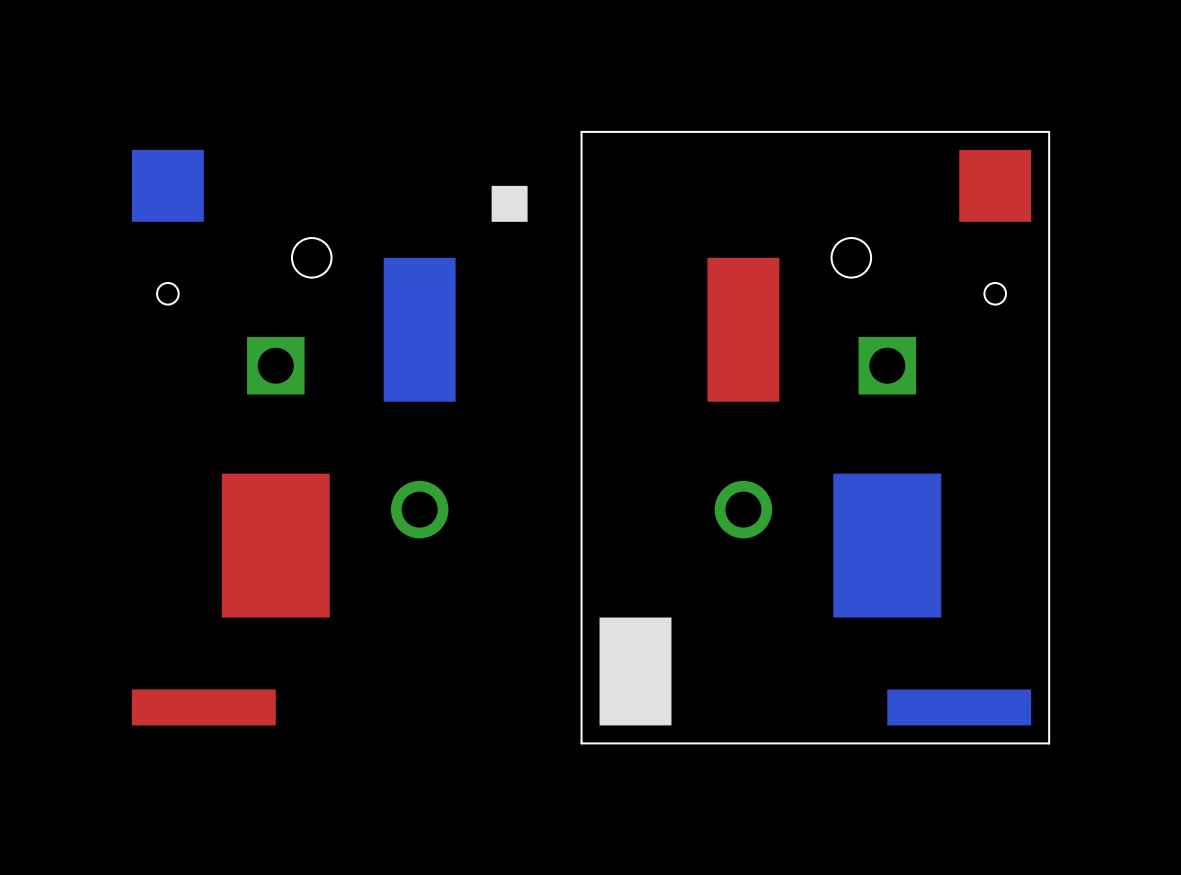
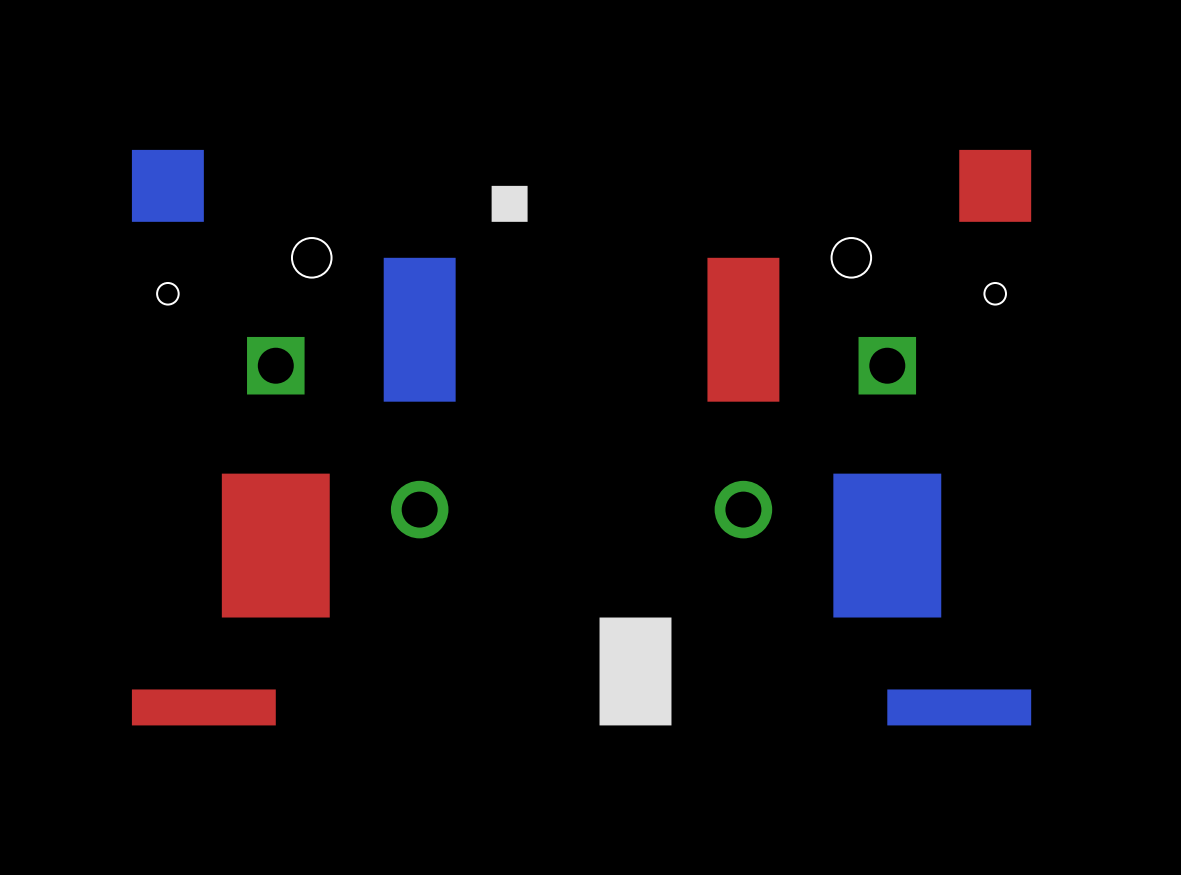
board edge: (1049, 131) (581, 131) (581, 743) (1049, 743) (1049, 131) -> none

